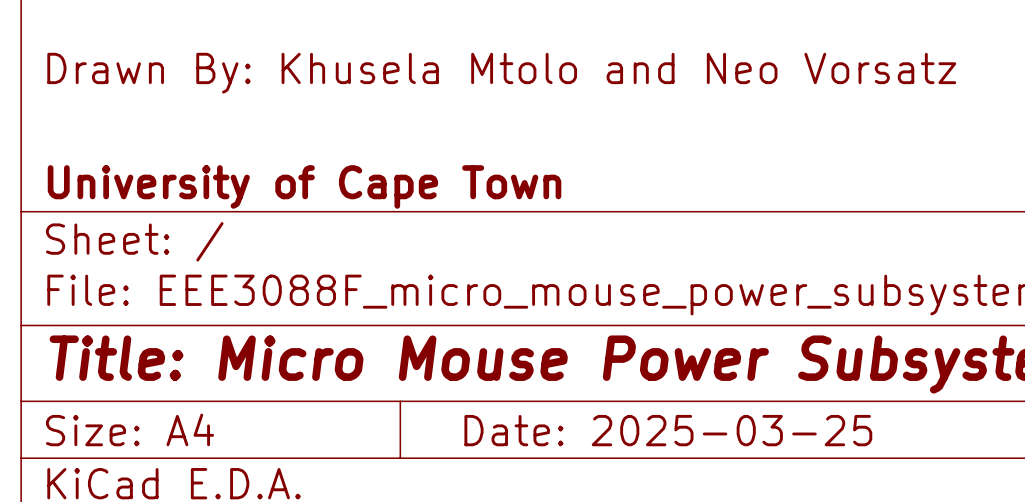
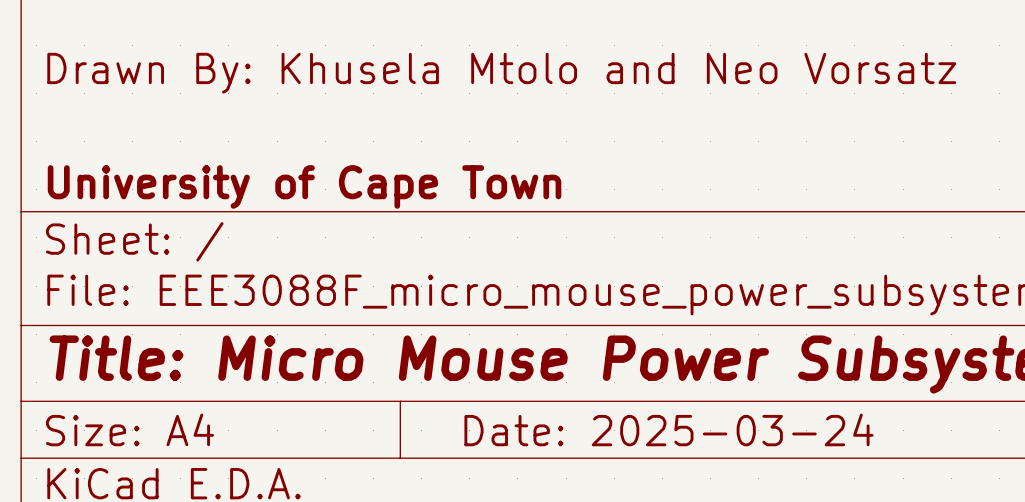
title block: Date: 2025-03-25 (668, 430) -> Date: 2025-03-24 (669, 429)

